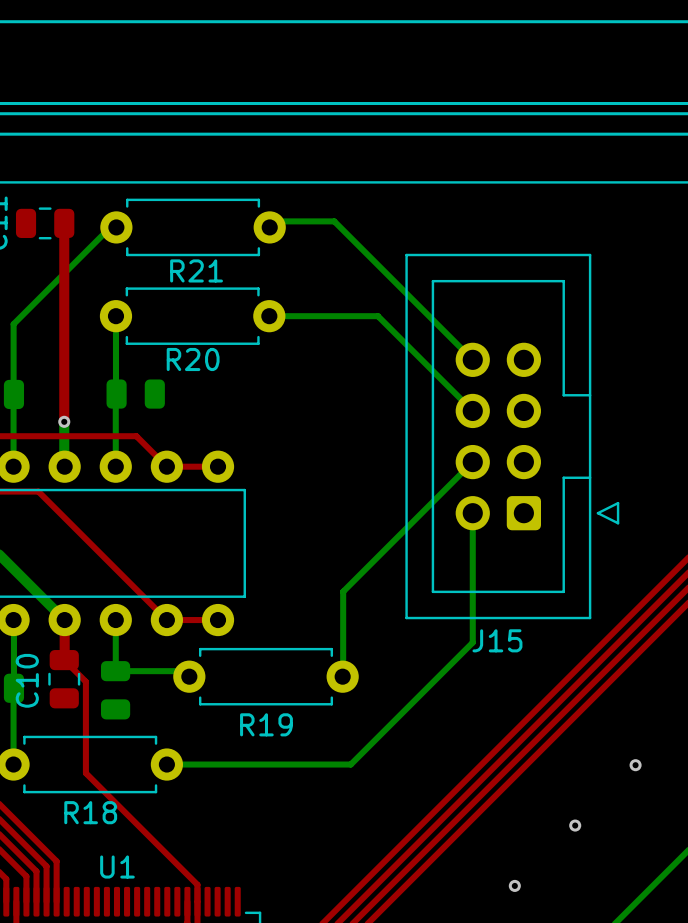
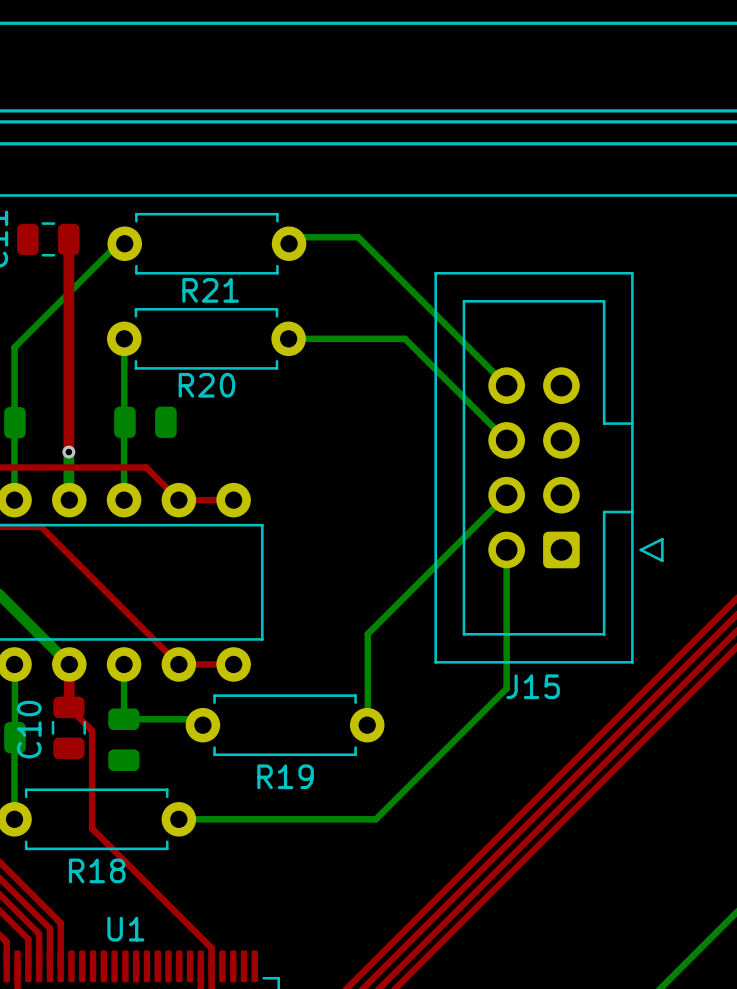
via: (635, 765) -> none
via: (575, 825) -> none
via: (514, 885) -> none

